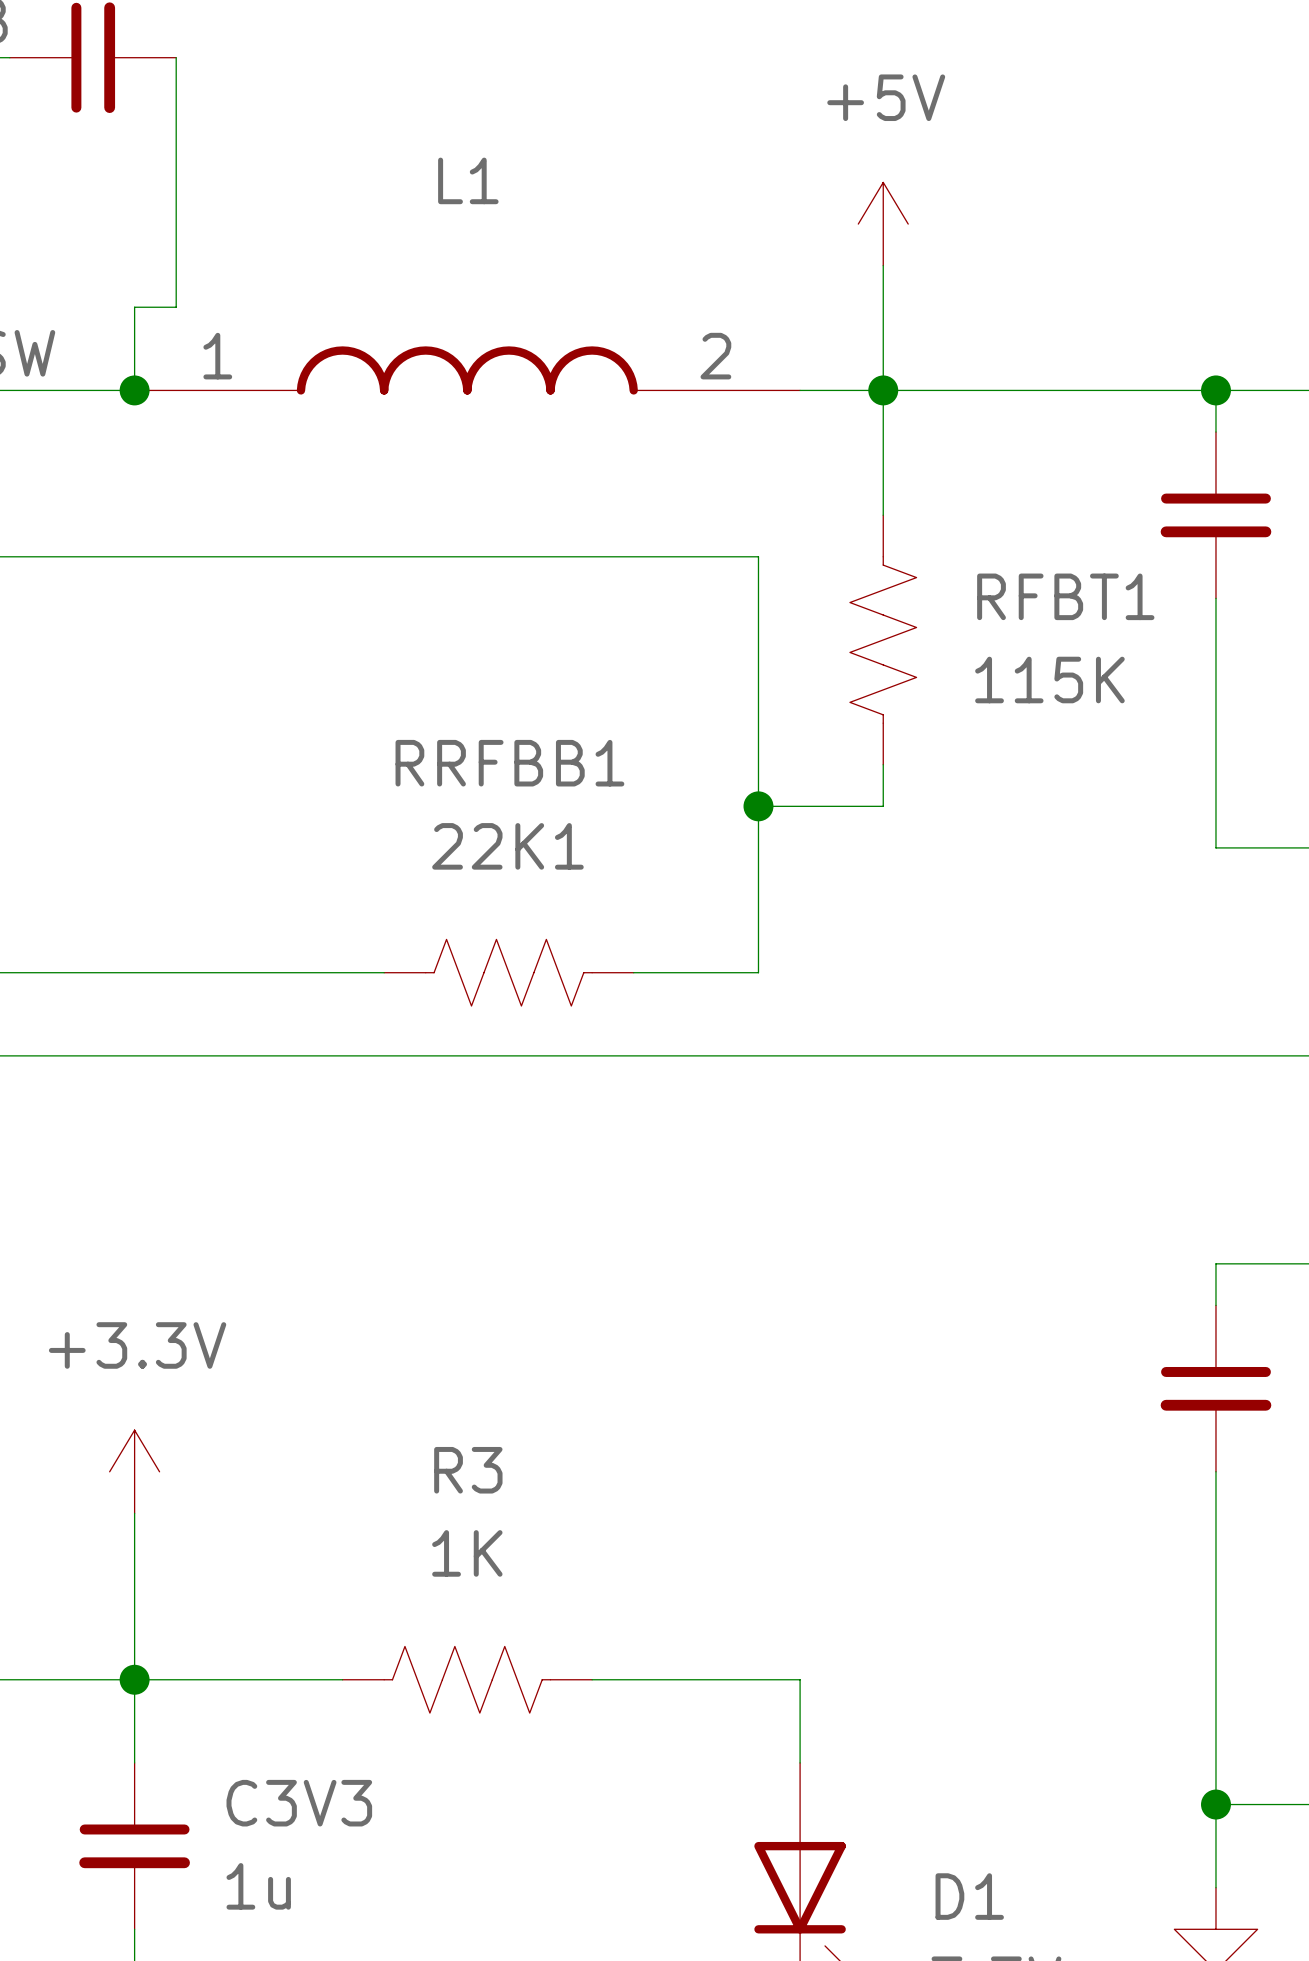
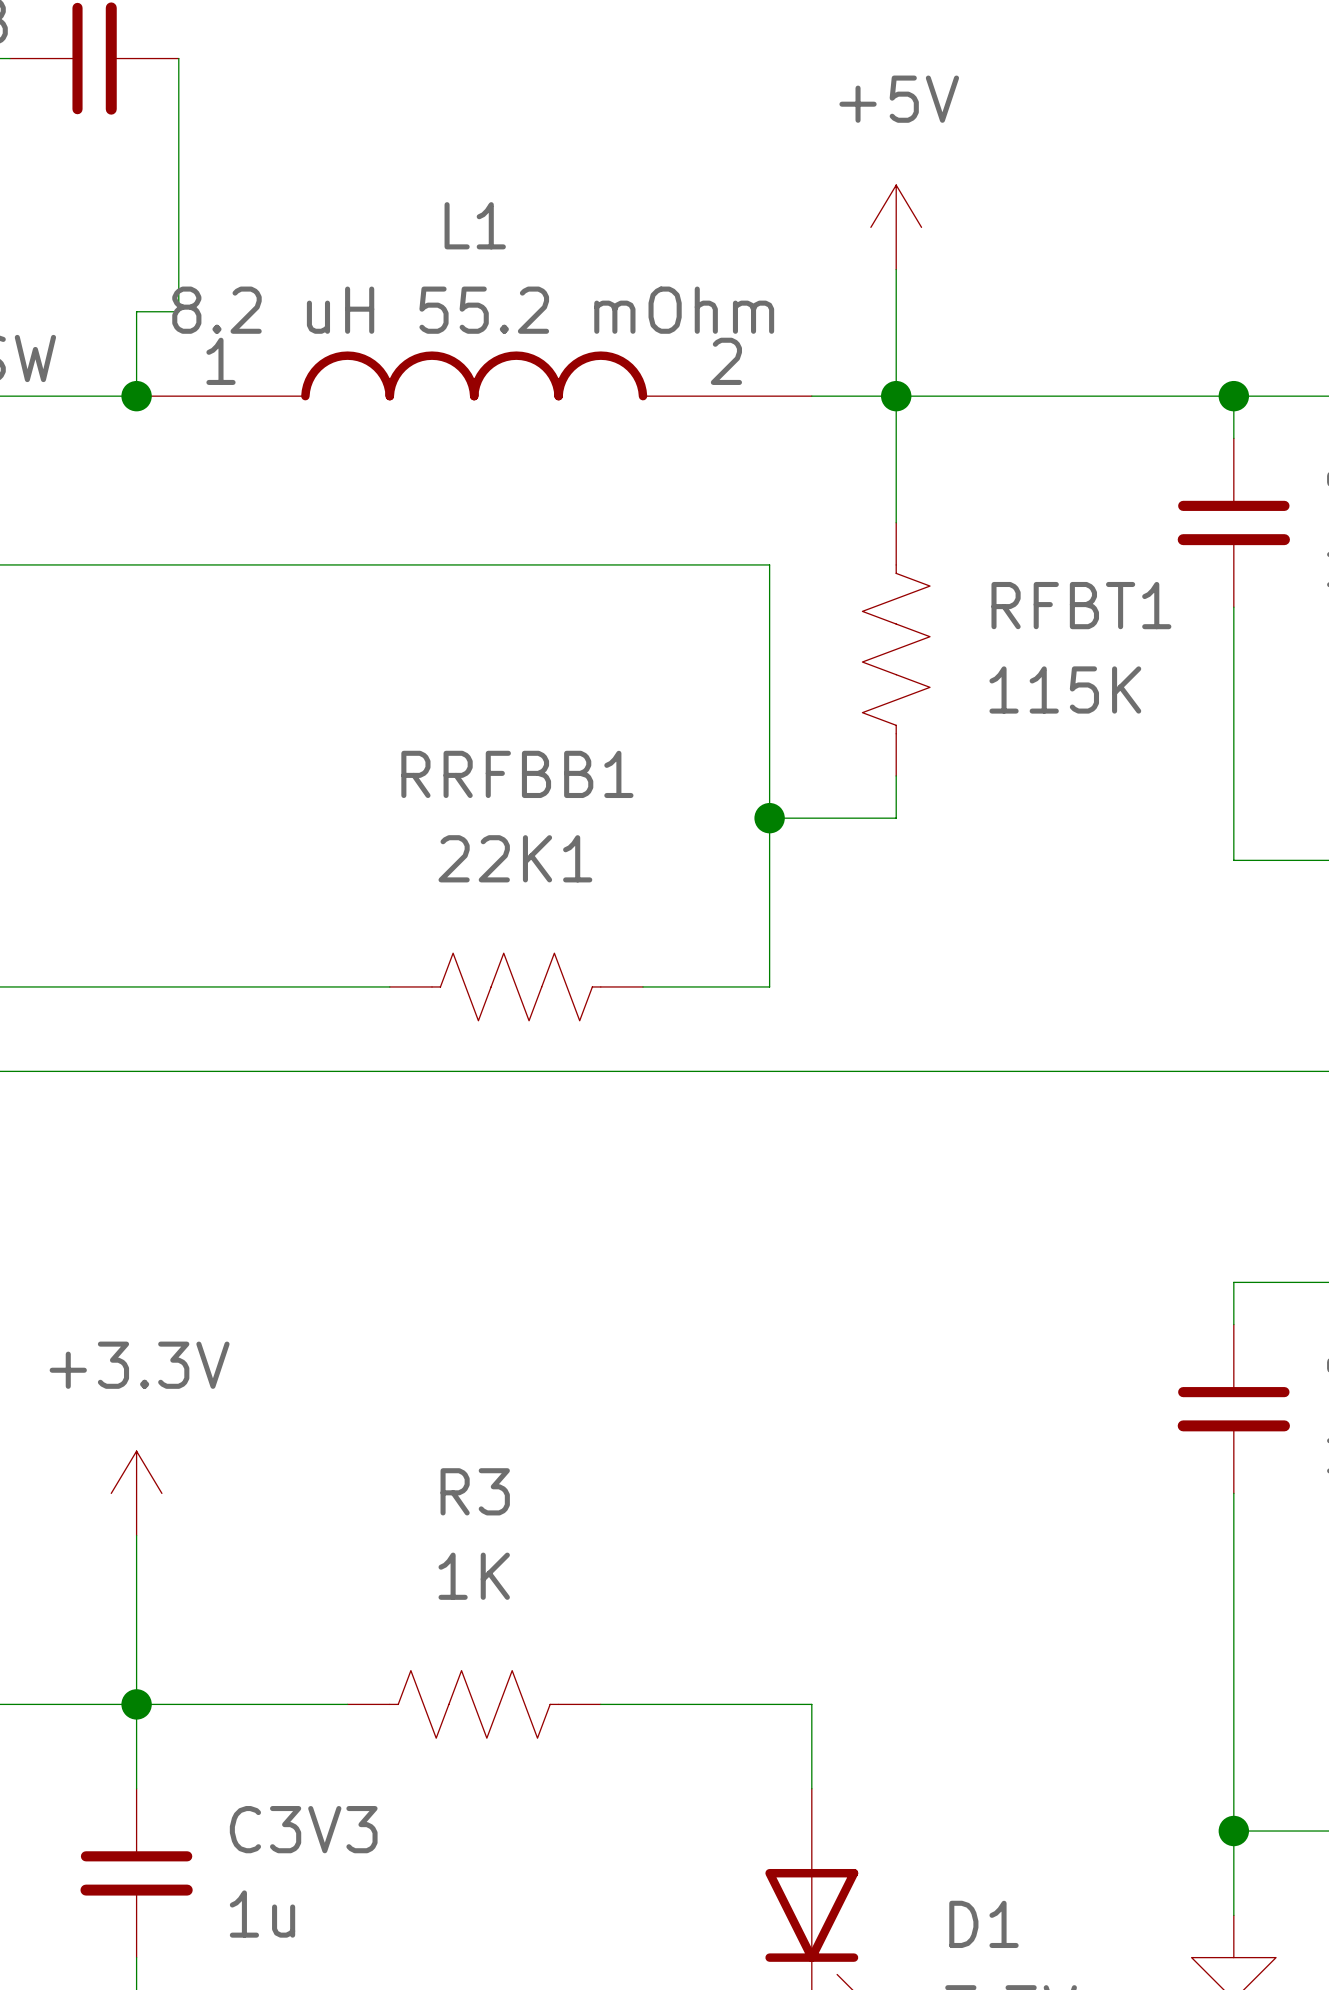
L1 name position: L1 (468, 180) -> L1 (475, 225)
L1 value: none -> 8.2 uH 55.2 mOhm (473, 310)

